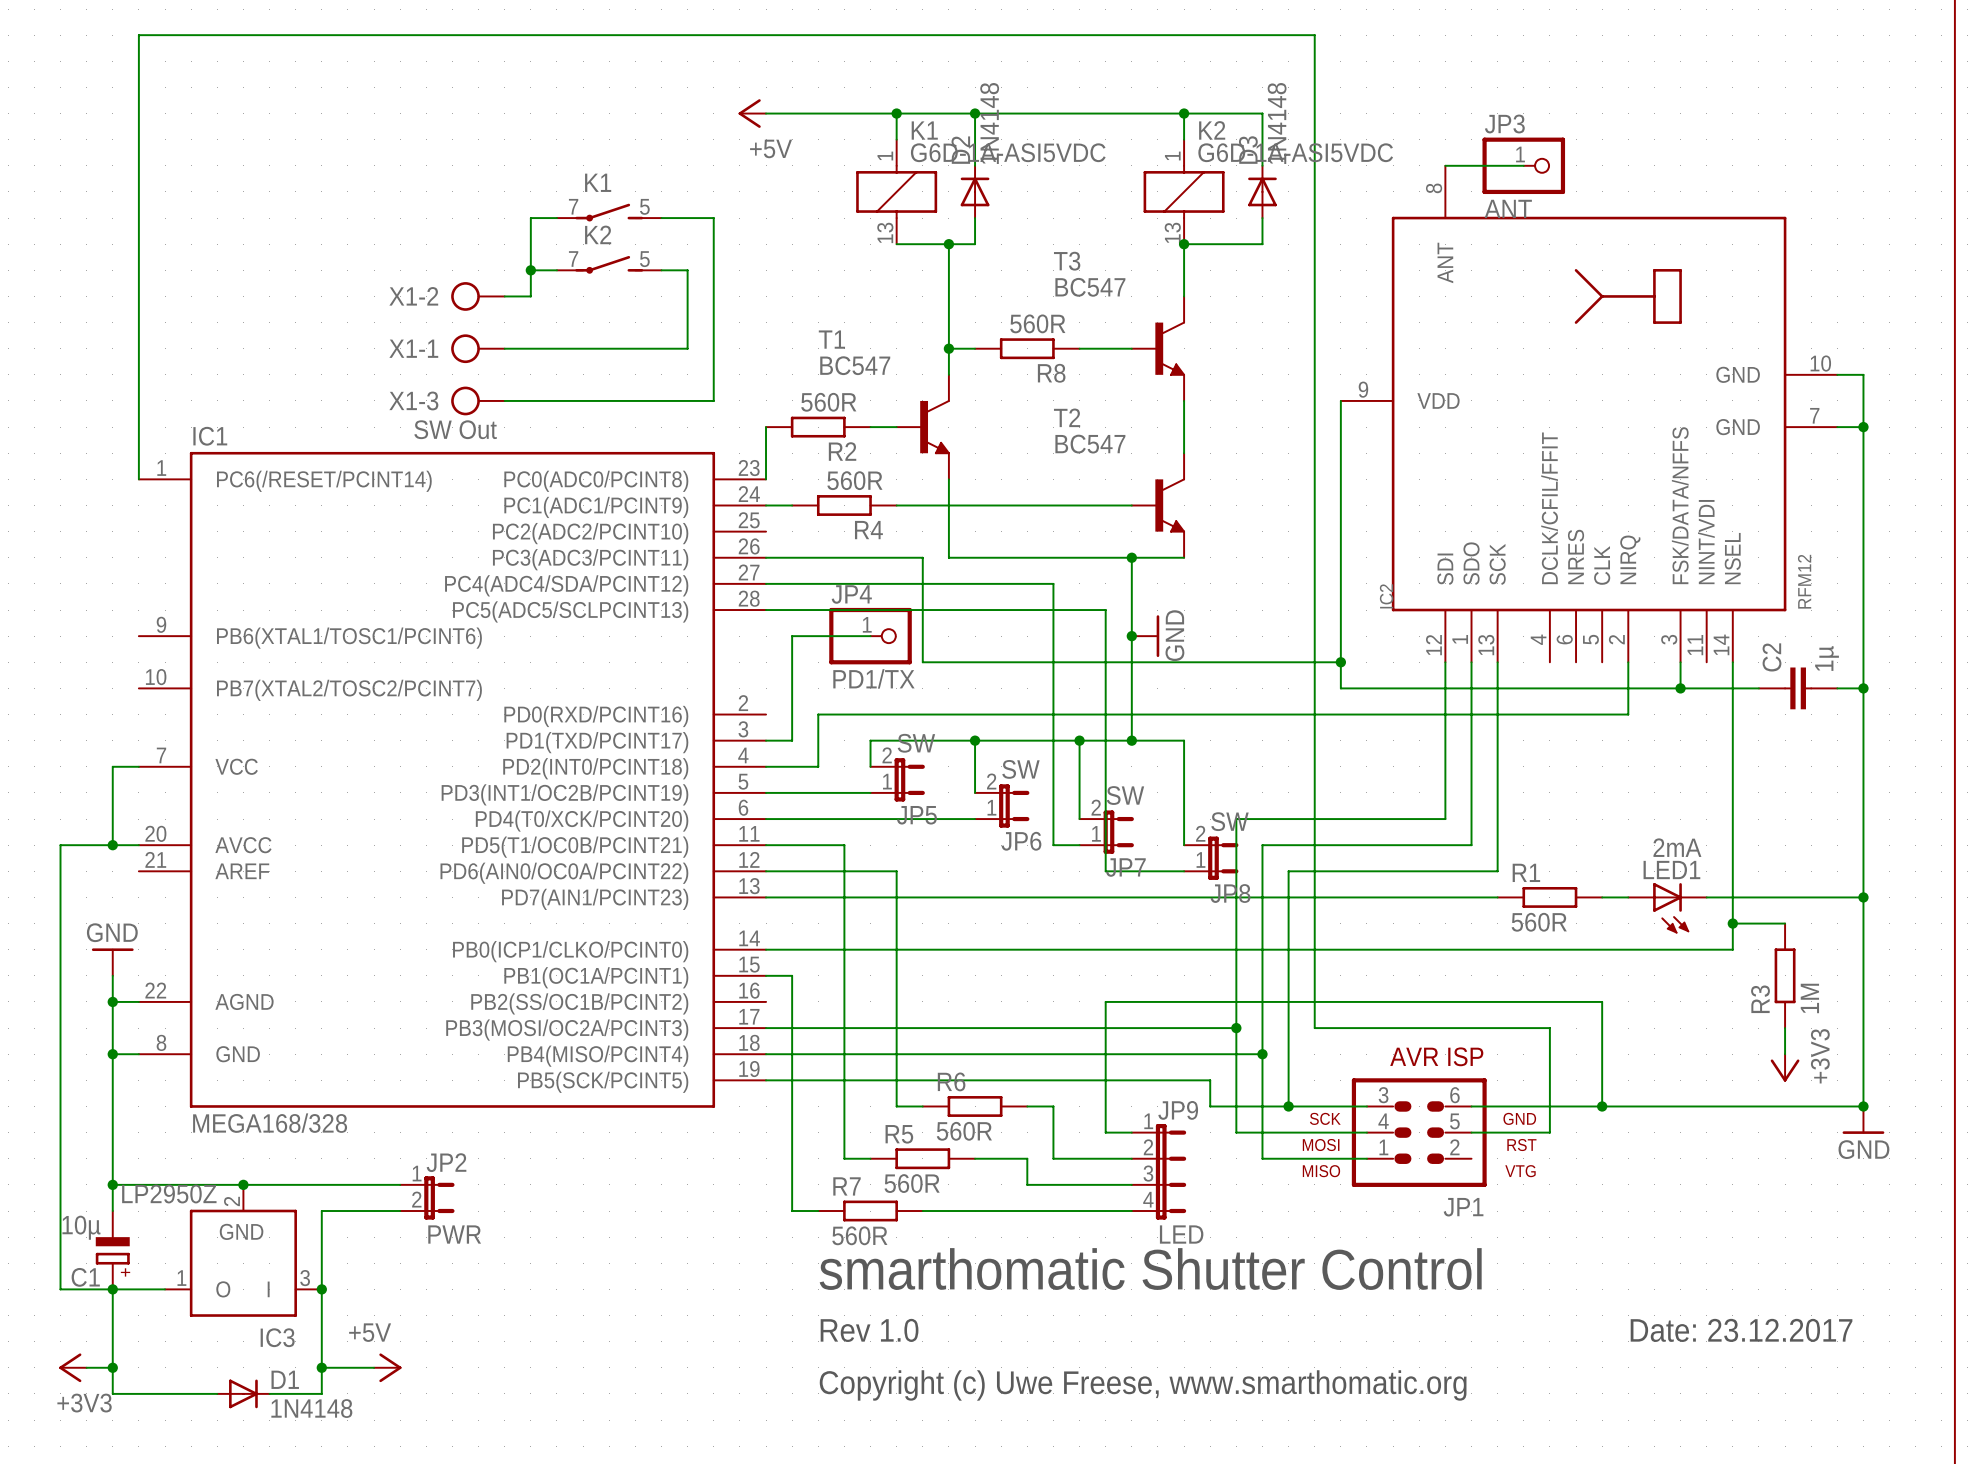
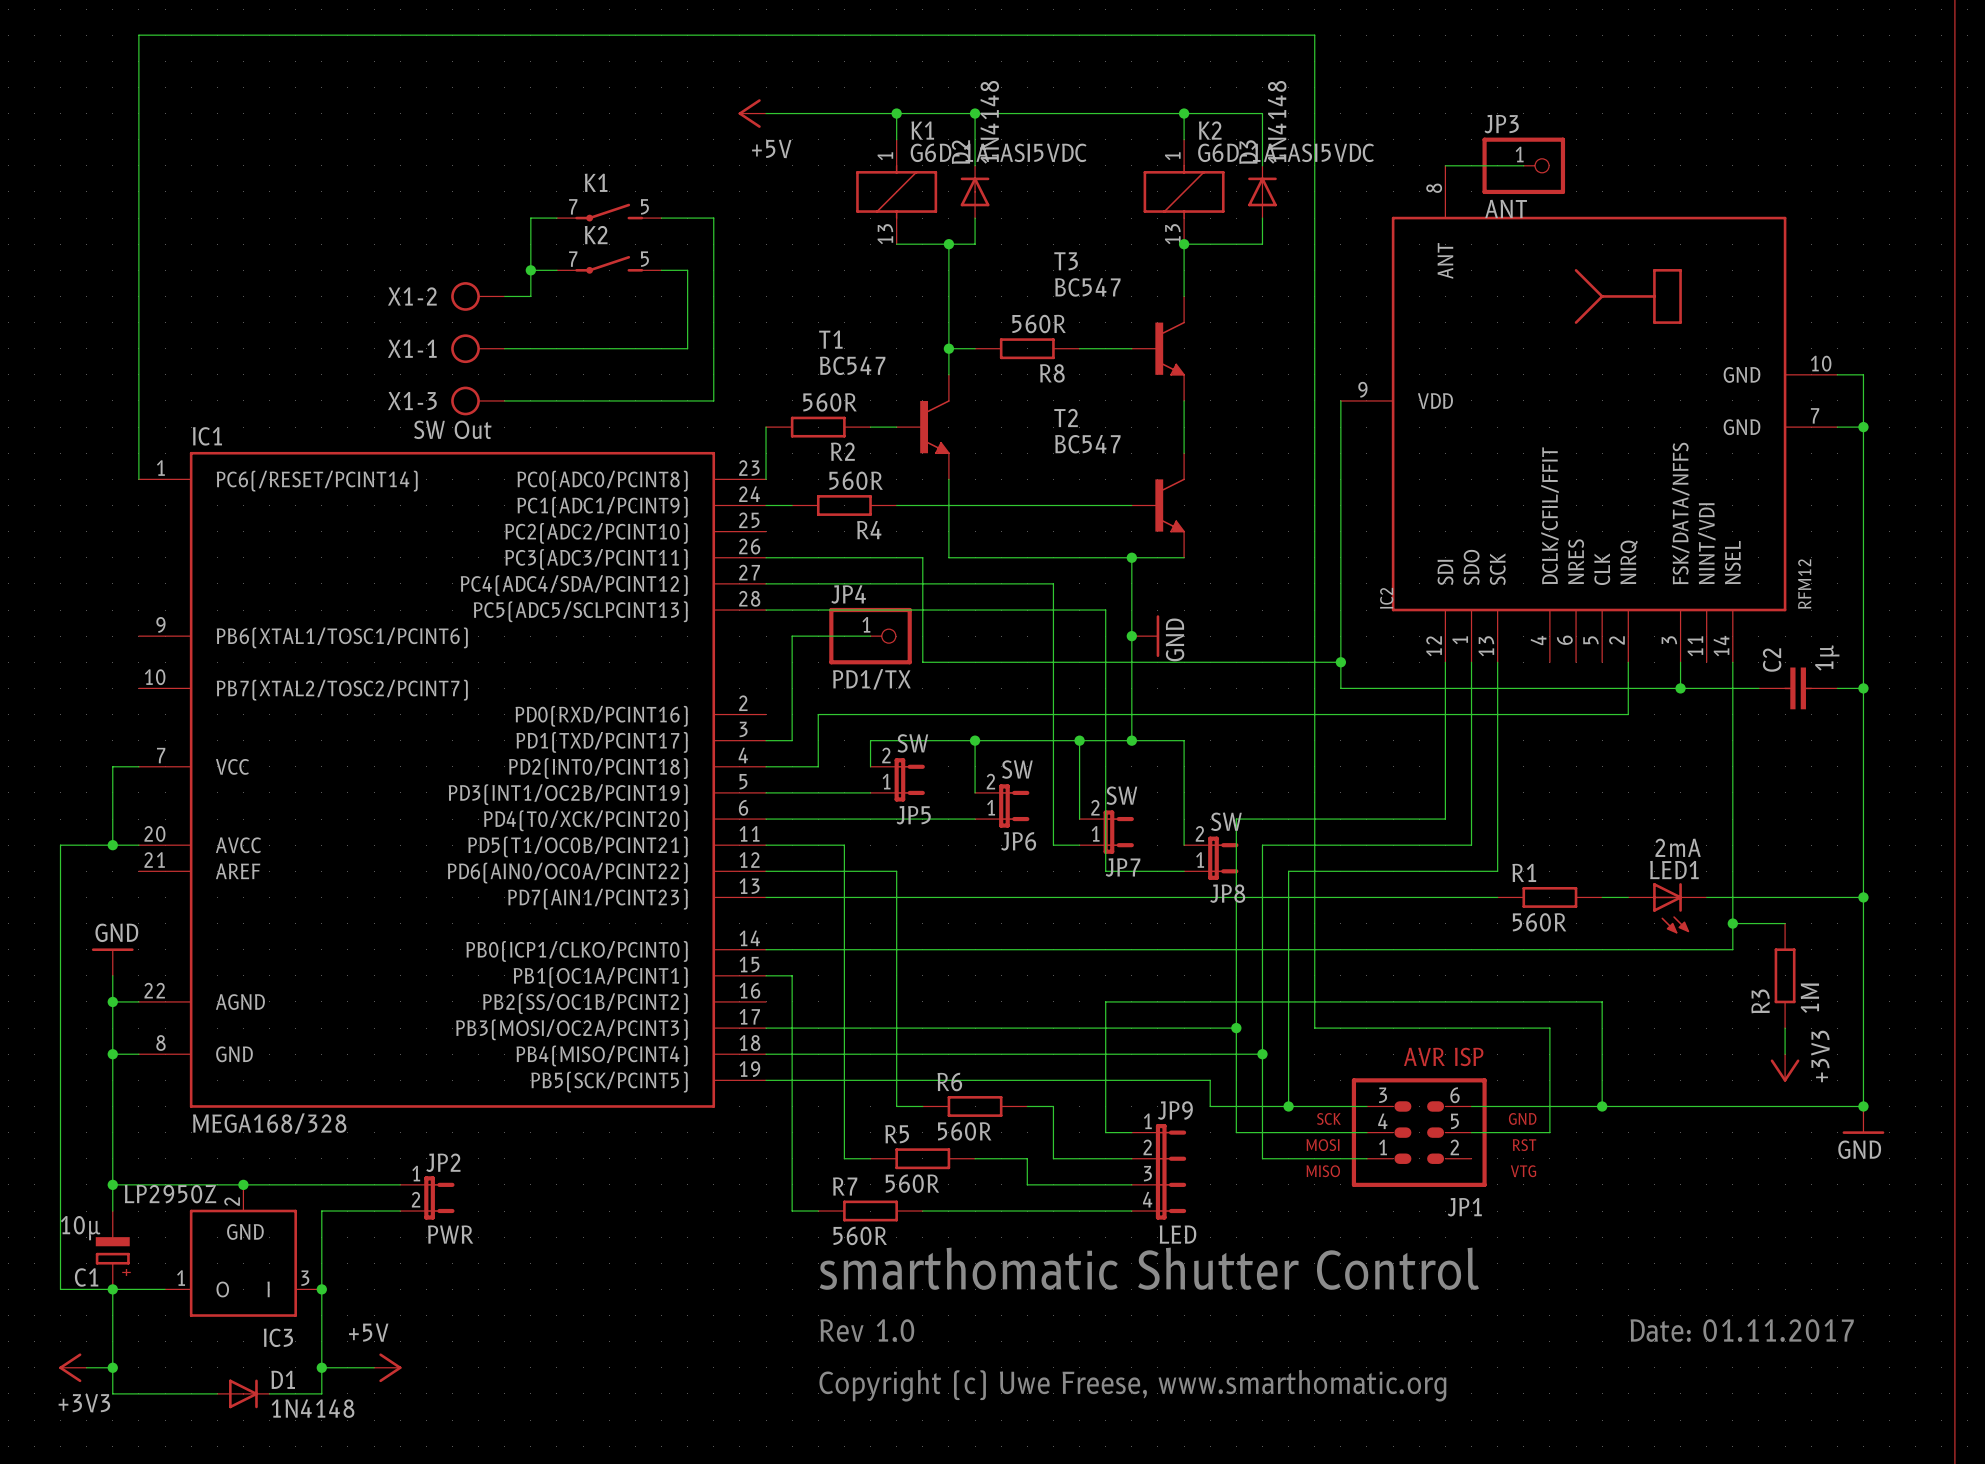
text: Date: 23.12.2017 (1741, 1330) -> Date: 01.11.2017 (1742, 1330)

